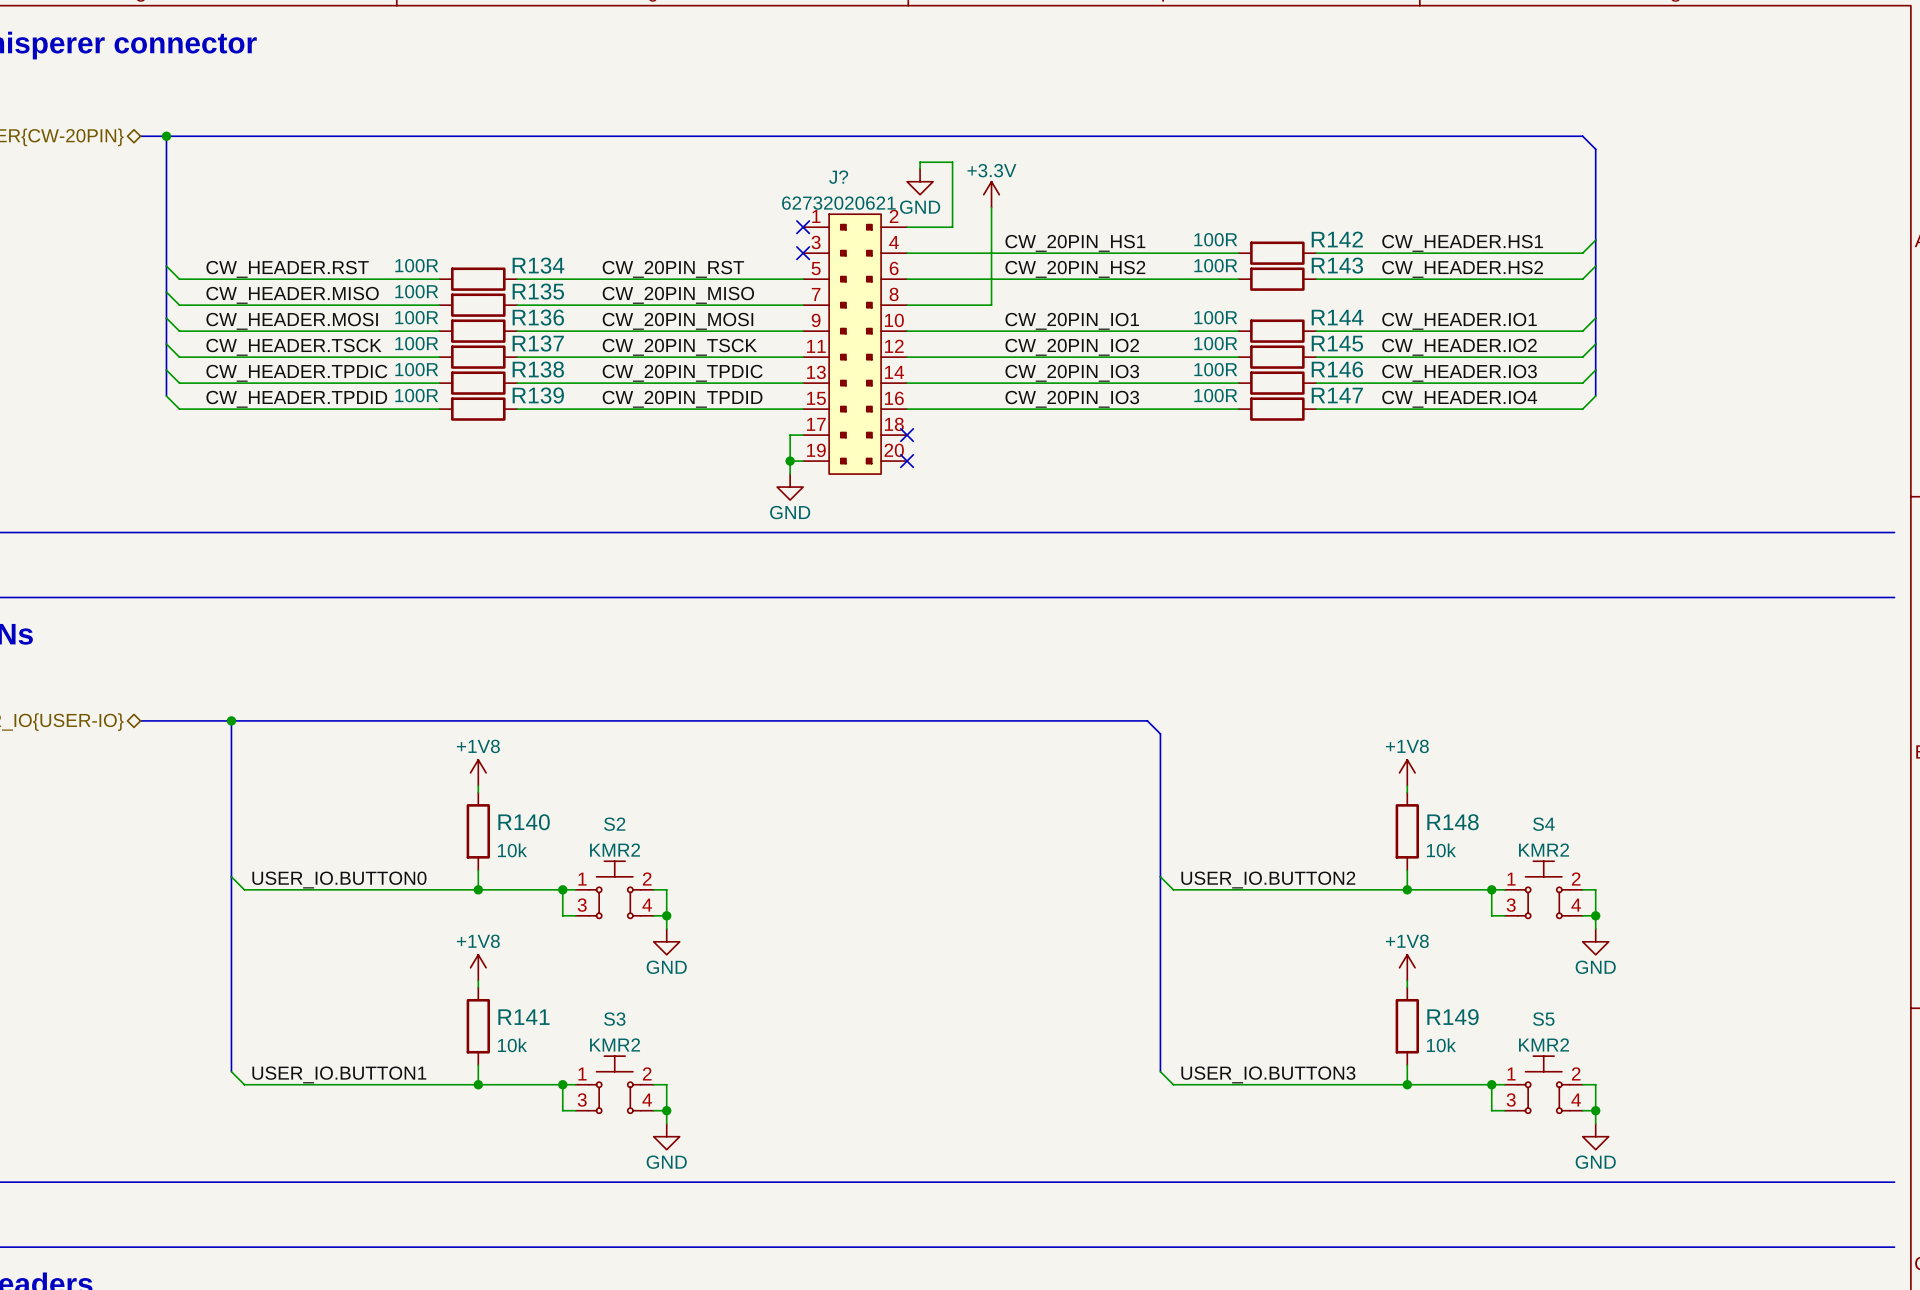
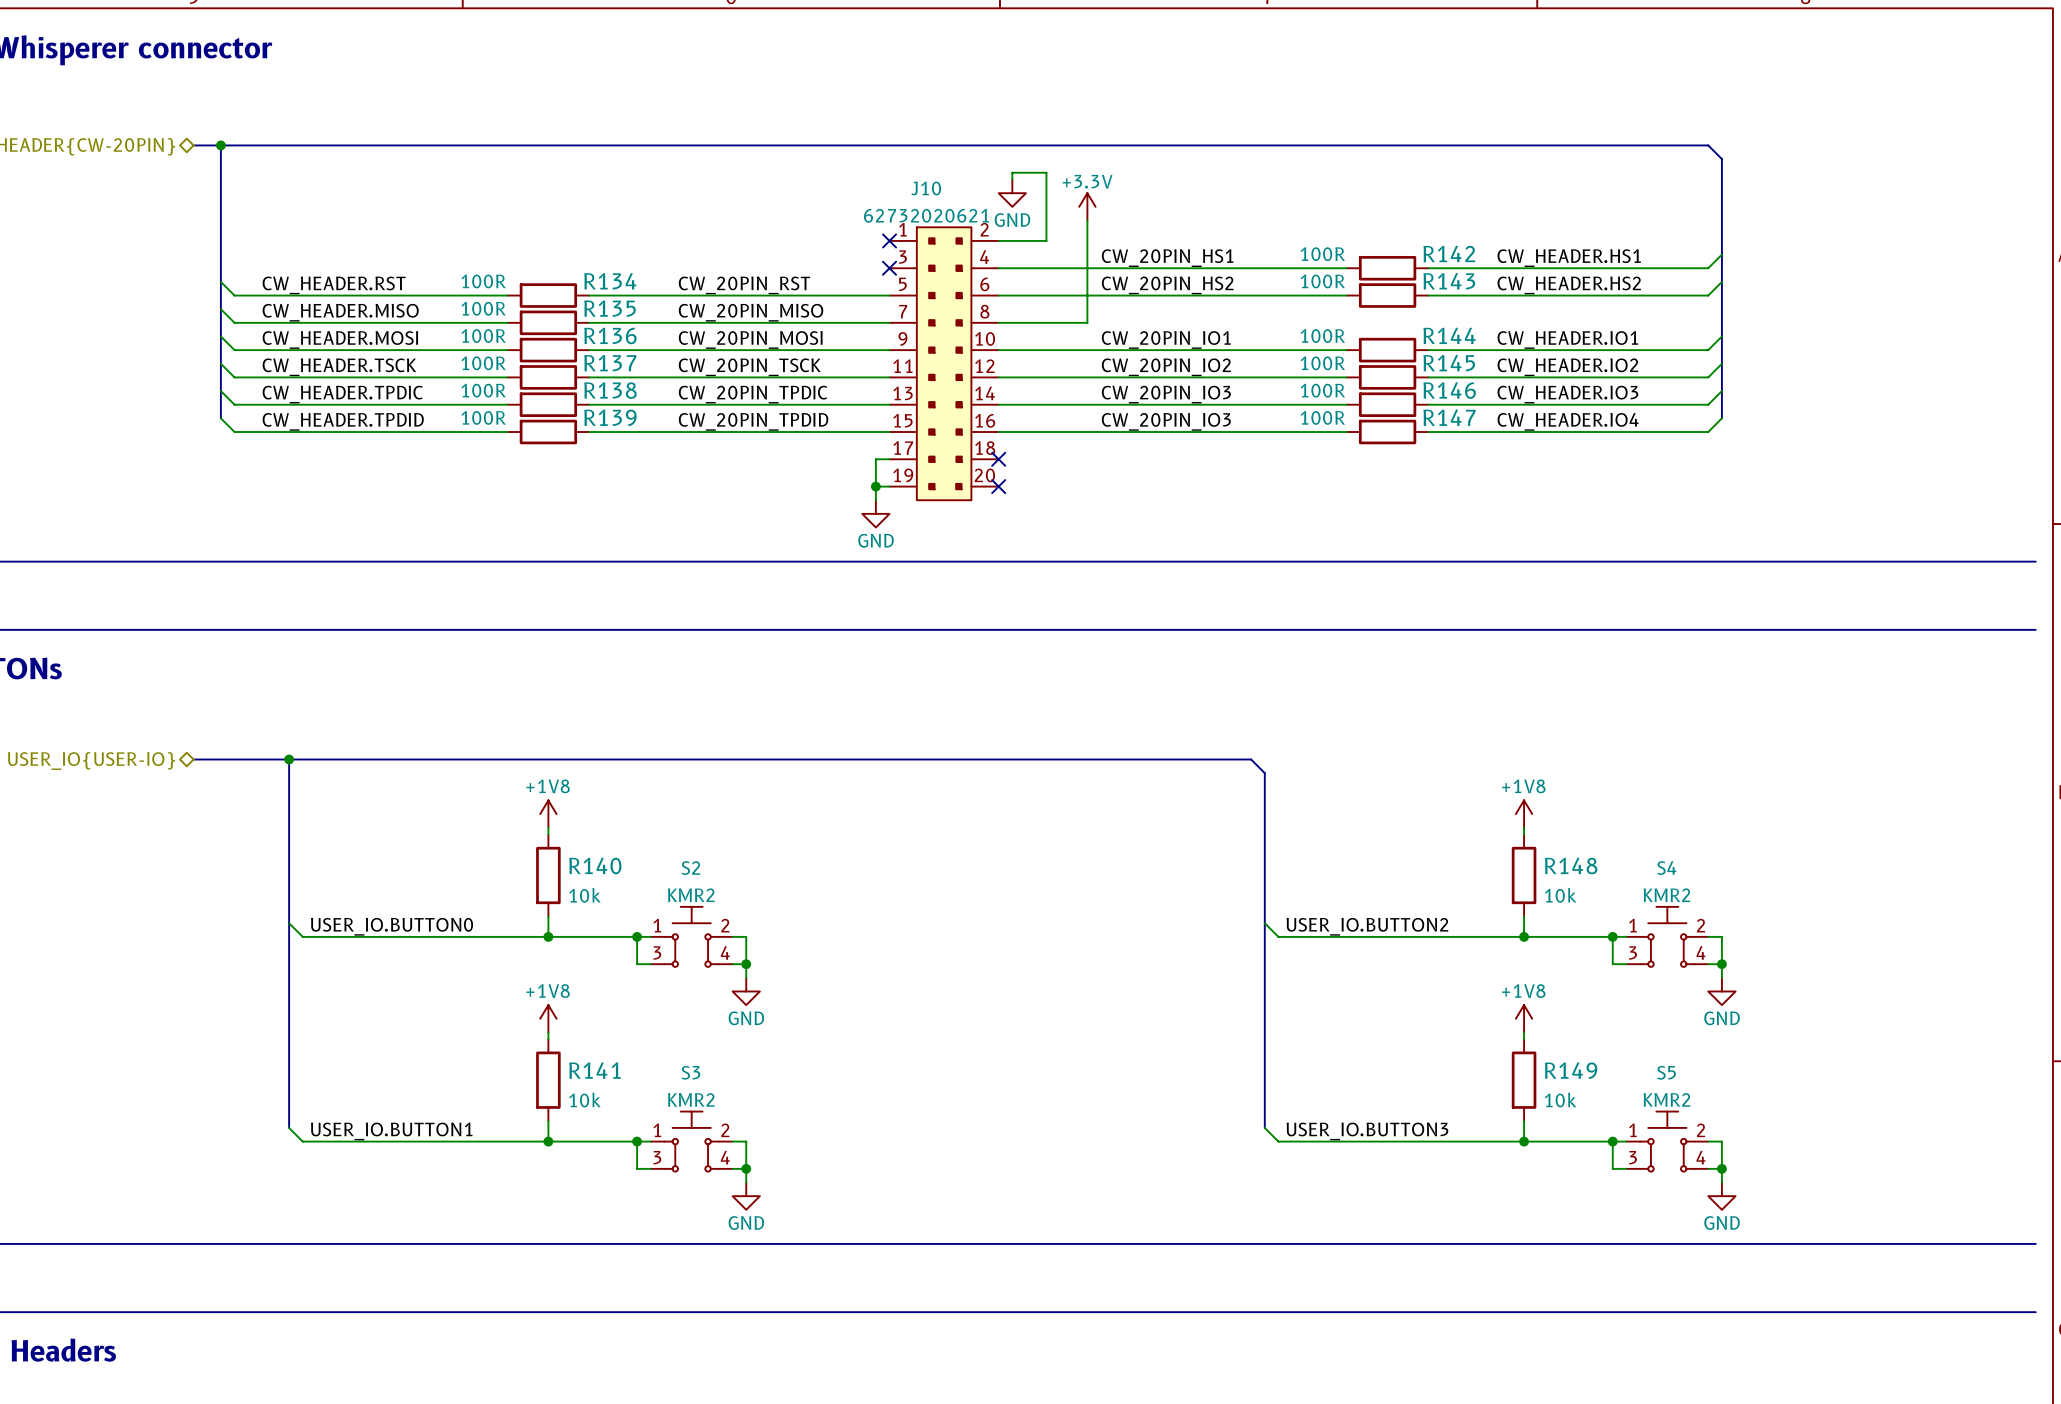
J? name: J? (838, 177) -> J10 (926, 188)

